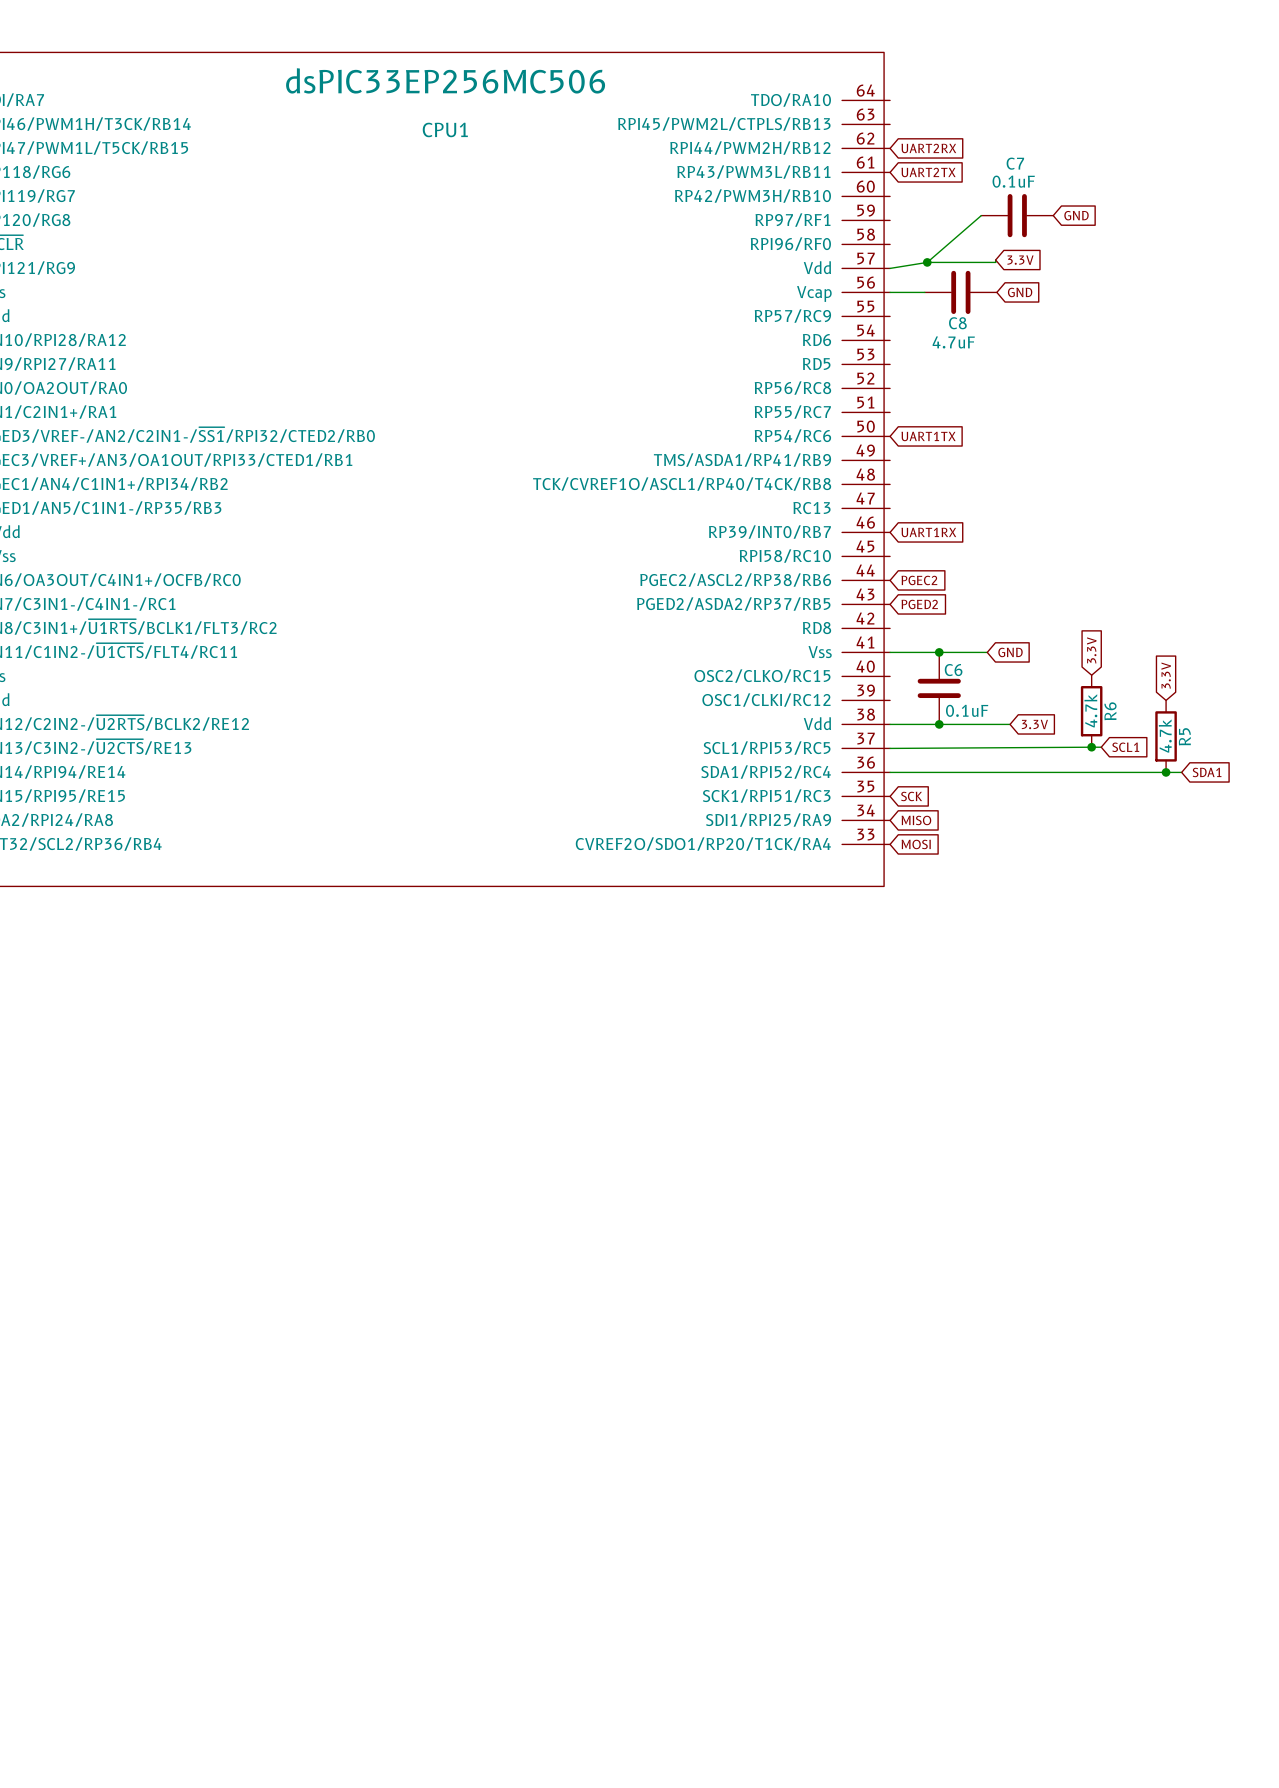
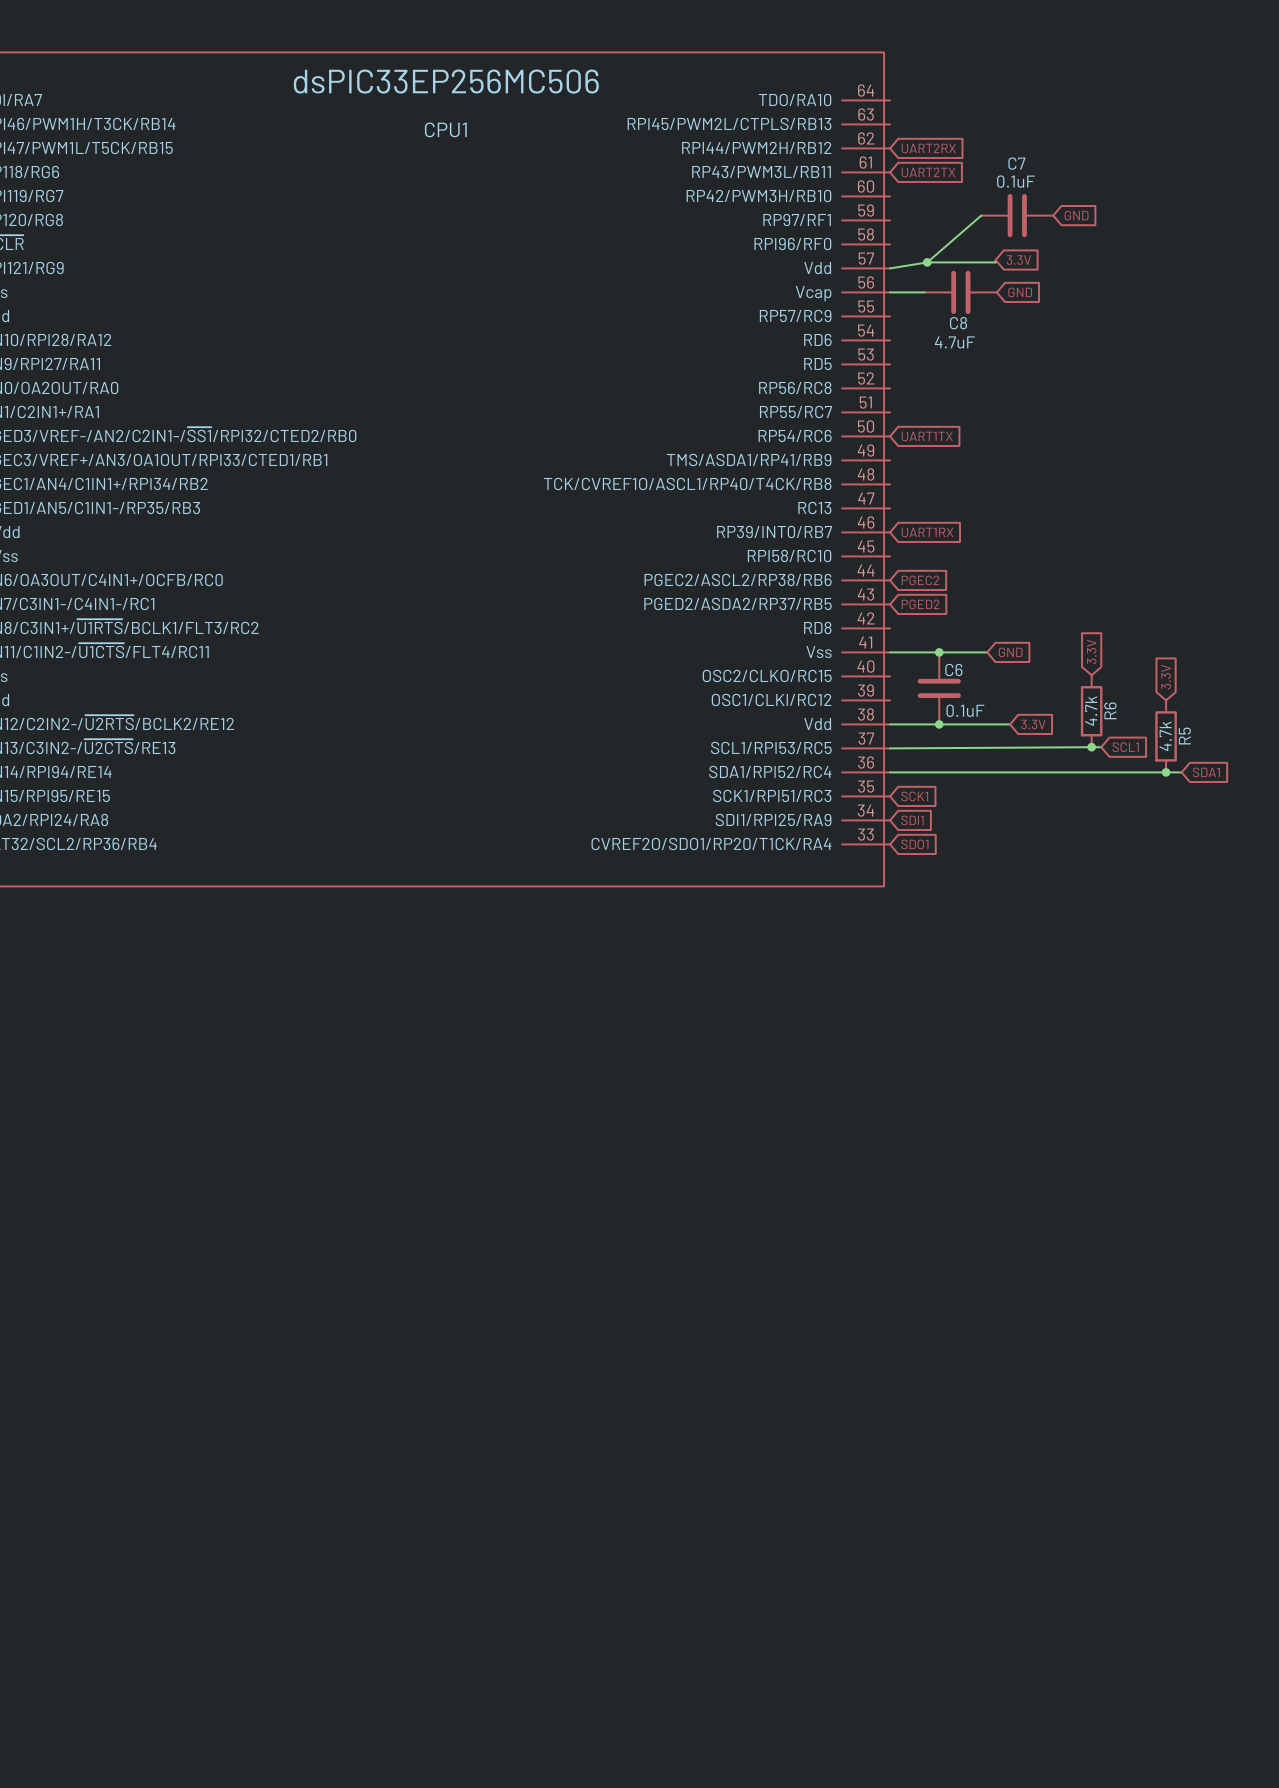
global label: SCK (911, 796) -> SCK1 (914, 796)
global label: MISO (916, 820) -> SDI1 (912, 820)
global label: MOSI (916, 844) -> SDO1 (914, 844)

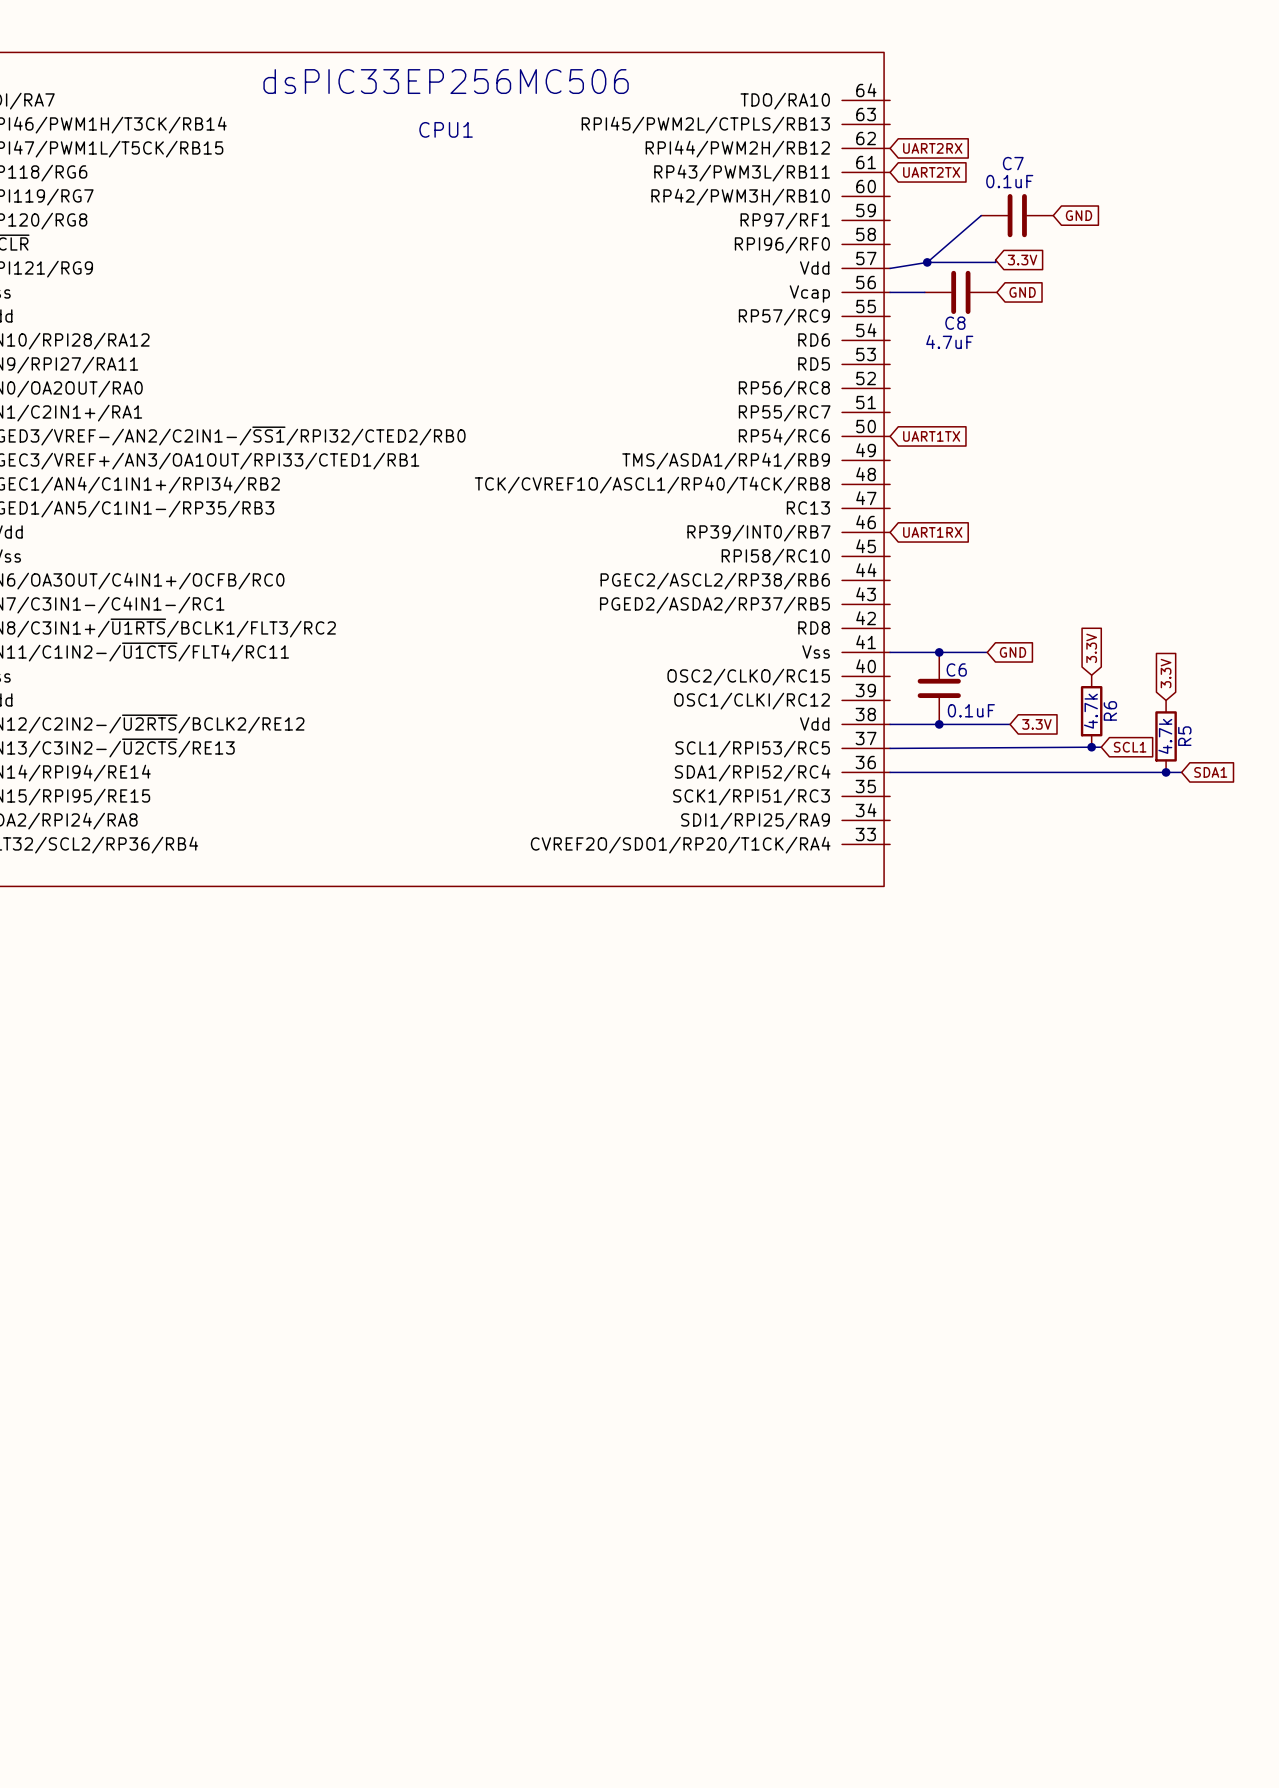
global label: PGEC2 (920, 580) -> none
global label: PGED2 (920, 604) -> none
global label: SCK1 (914, 796) -> none
global label: SDI1 (912, 820) -> none
global label: SDO1 (914, 844) -> none

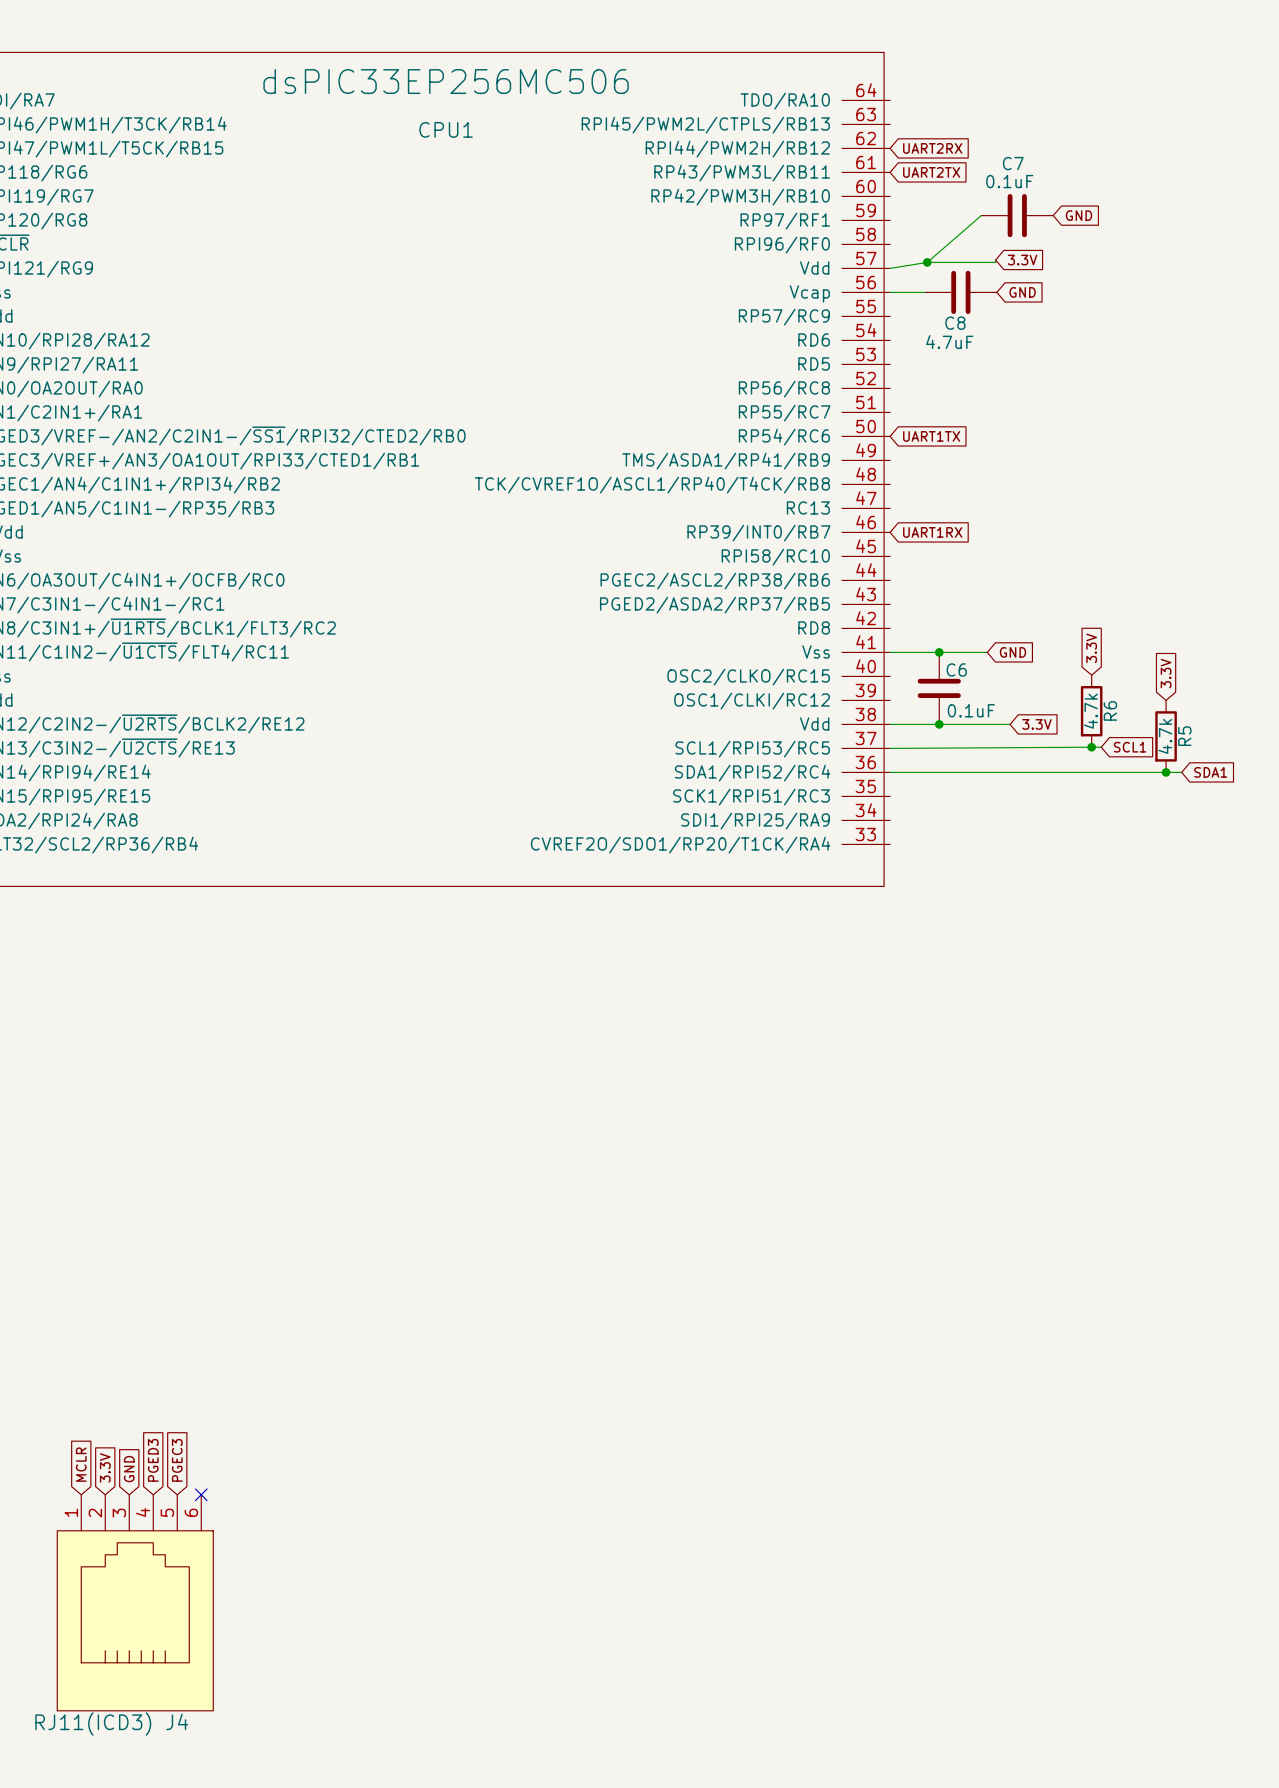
global label: none -> PGED3 (153, 1460)
global label: none -> PGEC3 (177, 1460)
global label: none -> MCLR (81, 1464)
global label: none -> 3.3V (105, 1467)
global label: none -> GND (129, 1469)
no-connect mark: none -> (201, 1494)
J4: none -> RJ11(ICD3) (135, 1602)

